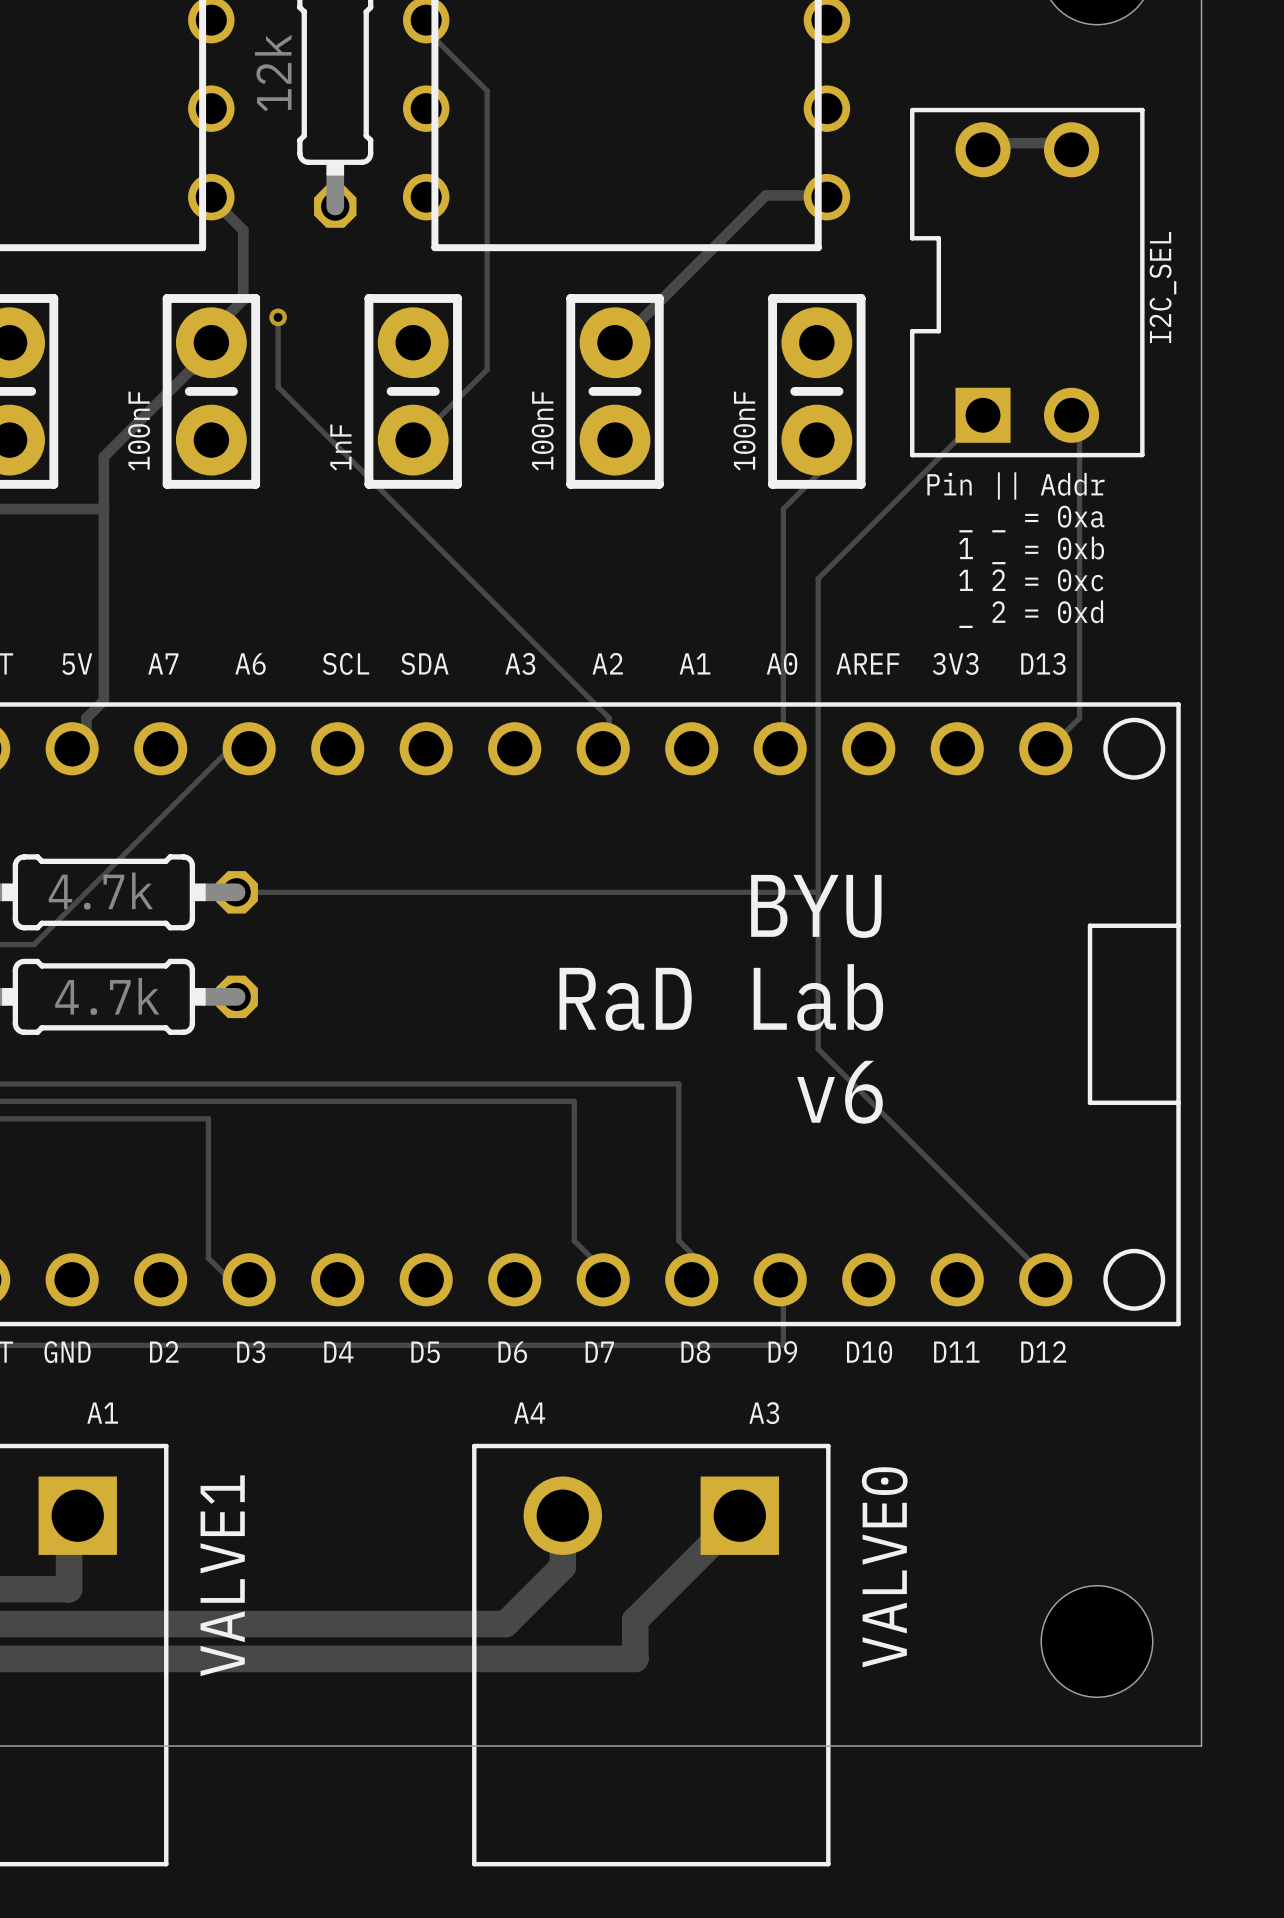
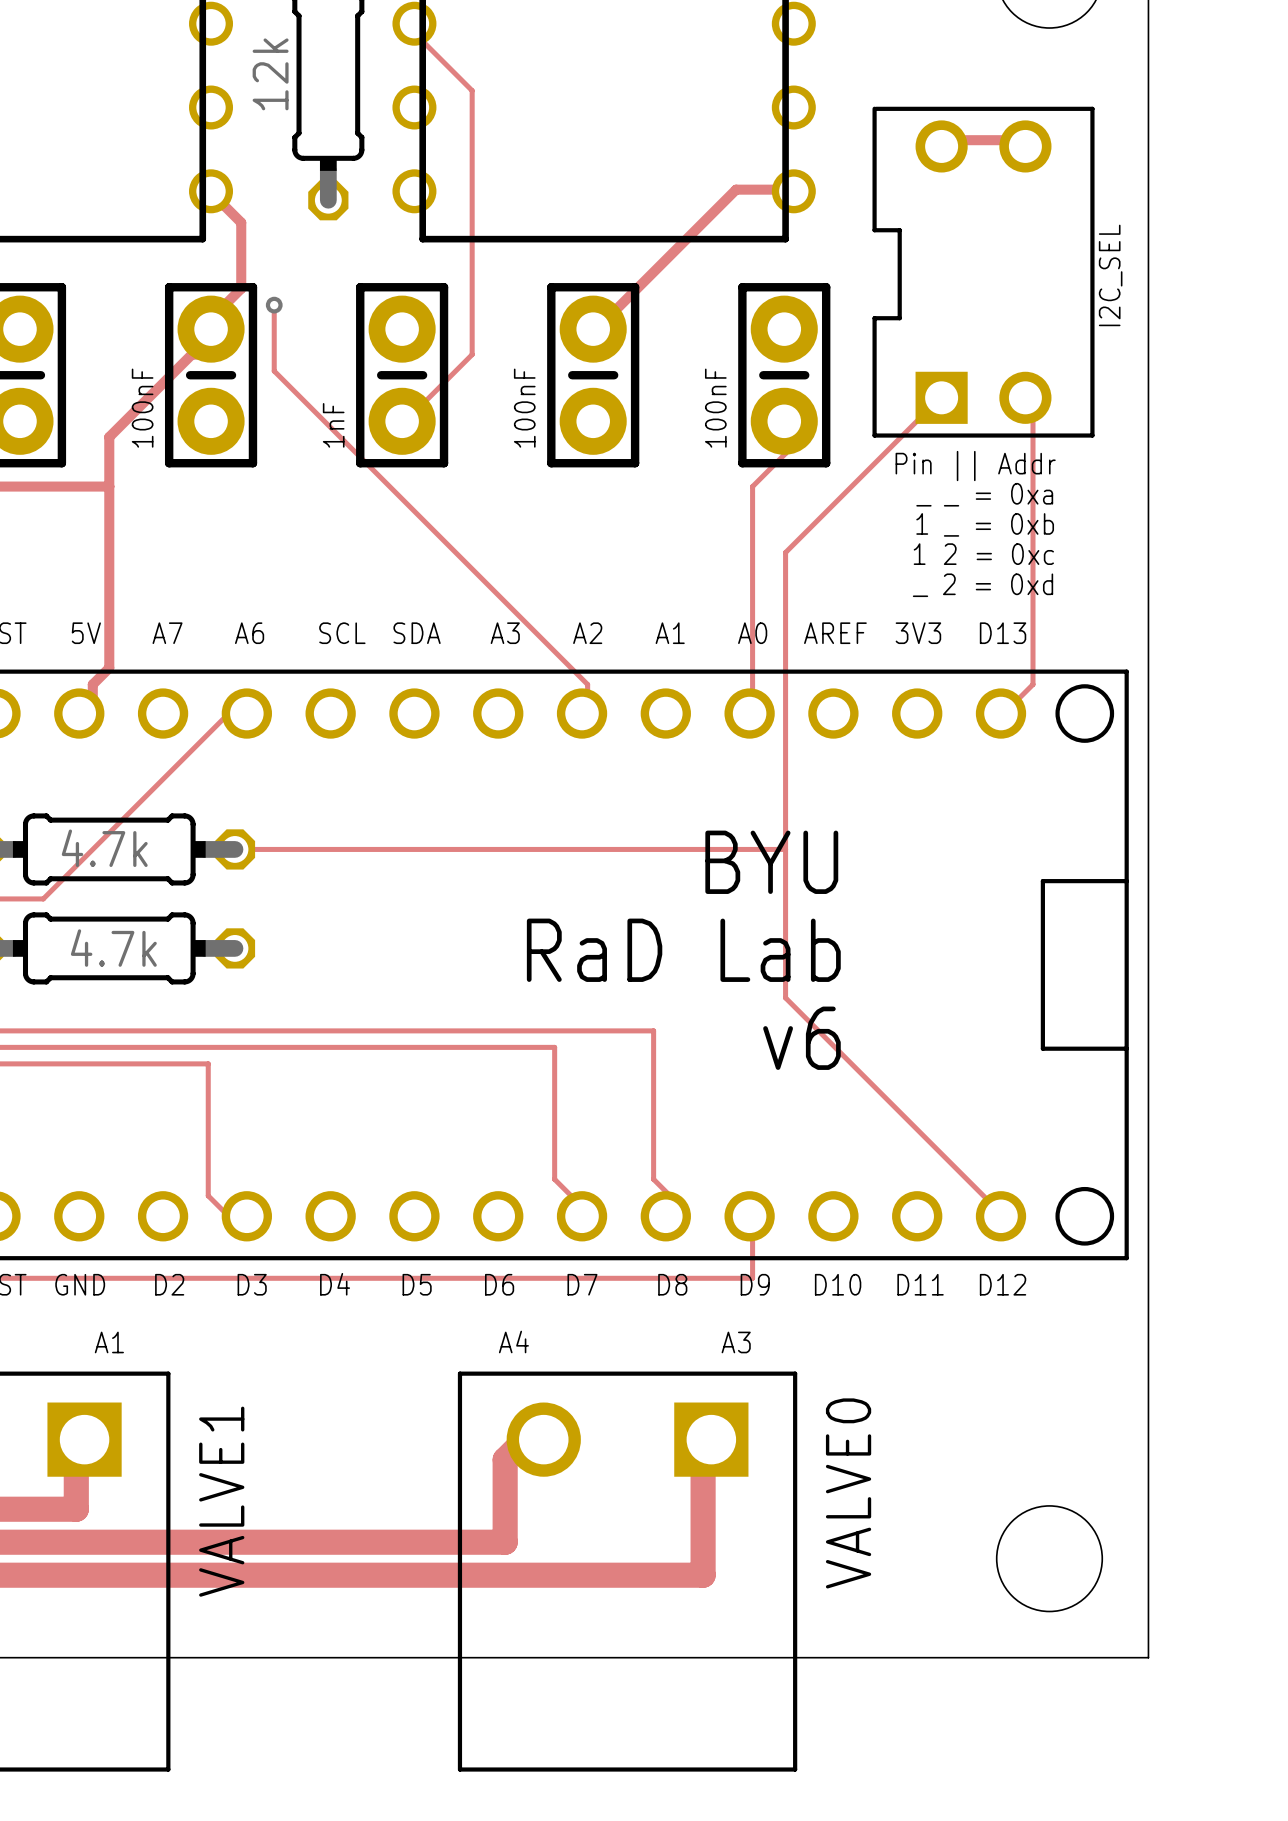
track: (562, 1515) (562, 1566) (505, 1624) -> (543, 1439) (538, 1426) (505, 1459) (505, 1542) (489, 1542)
track: (739, 1515) (635, 1620) (635, 1658) -> (711, 1439) (703, 1443) (703, 1575) (612, 1575)

